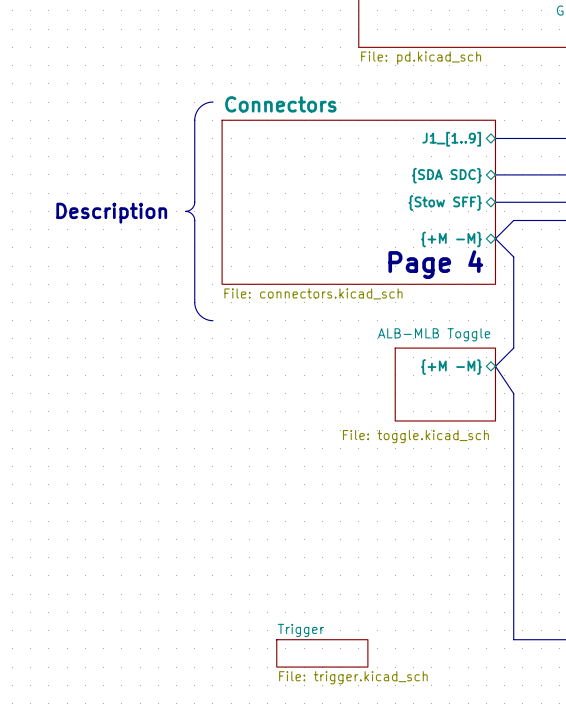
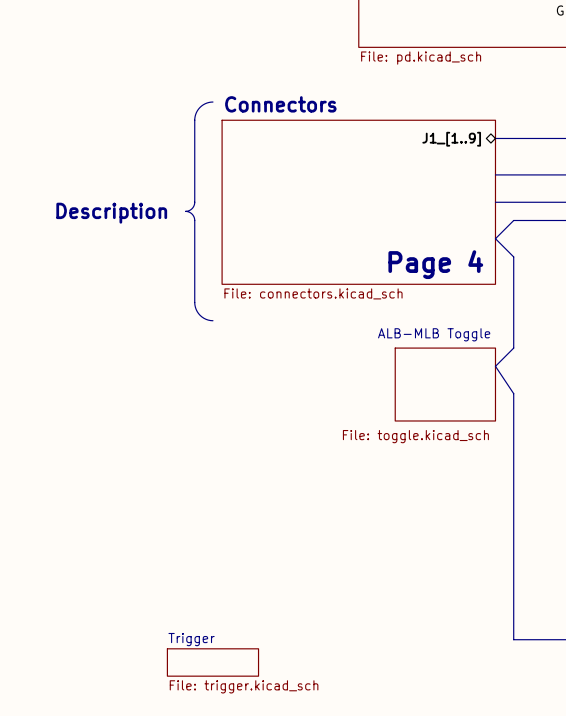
sheet pin: {SDA SDC} (446, 175) -> none
sheet pin: {Stow SFF} (445, 203) -> none
sheet pin: {+M -M} (451, 239) -> none
sheet pin: {+M -M} (451, 367) -> none
sheet Trigger position: (322, 653) -> (212, 662)

